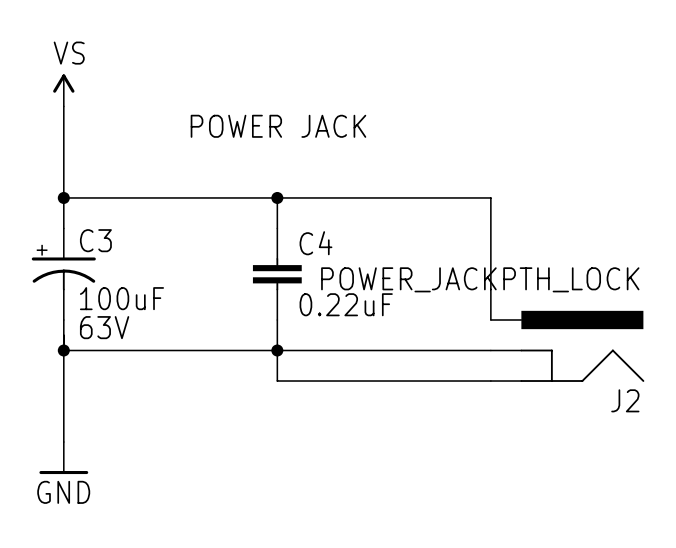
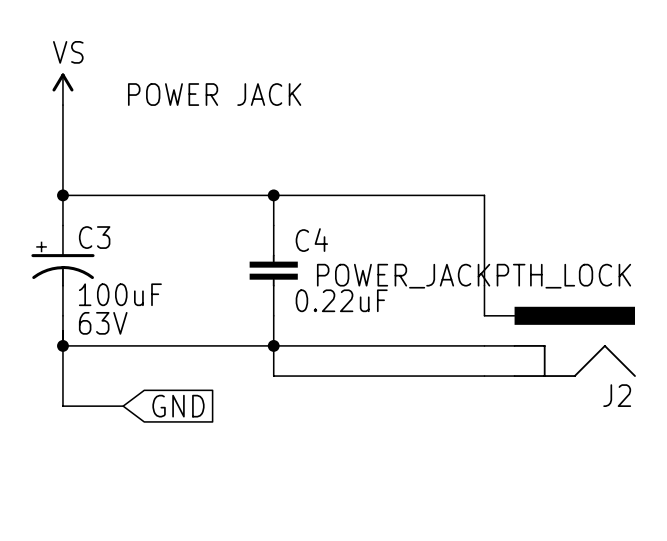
text position: POWER JACK (278, 126) -> POWER JACK (214, 94)
wire: (63, 411) (63, 442) -> (62, 406) (123, 406)
global label: none -> GND (178, 406)
power symbol: GND (63, 458) -> none

